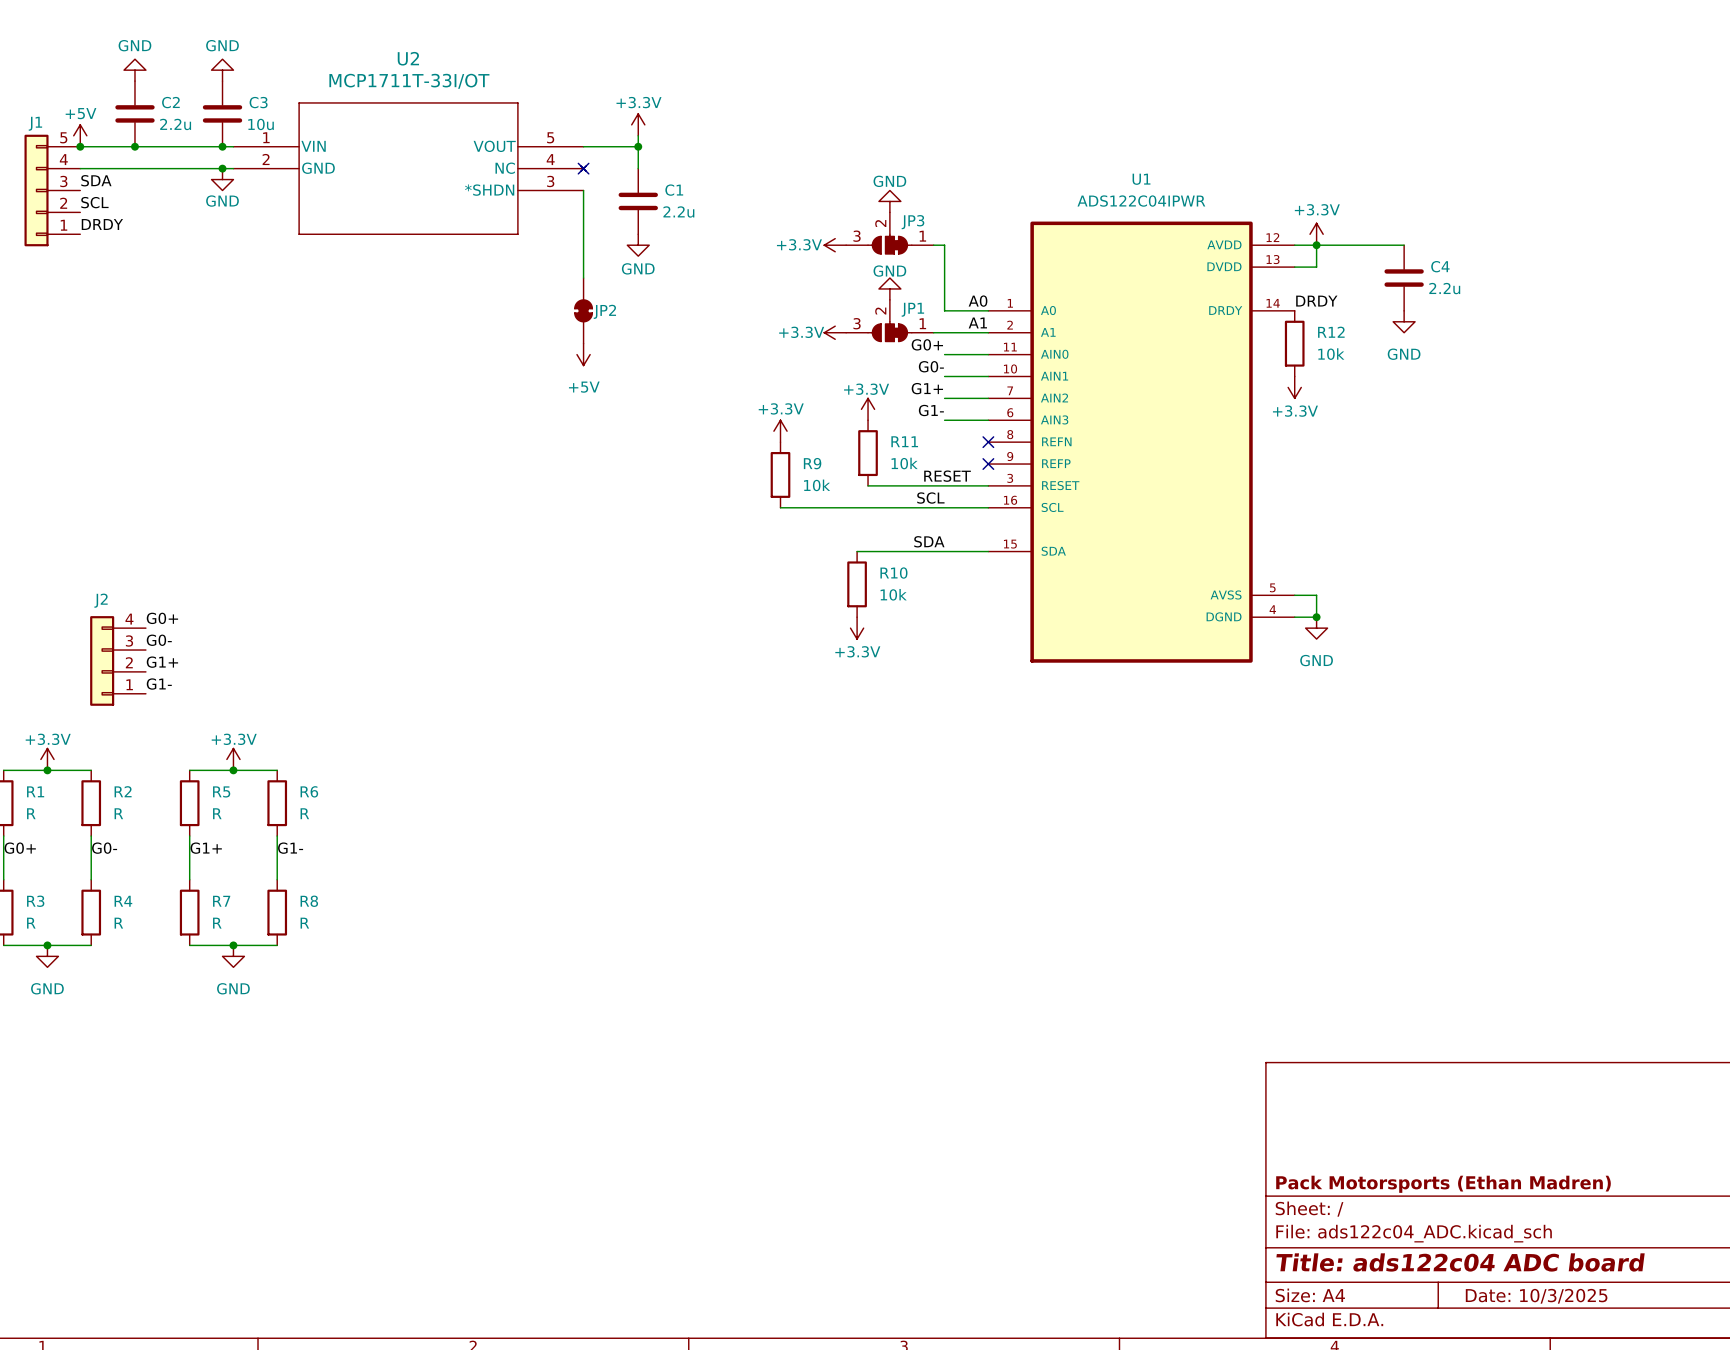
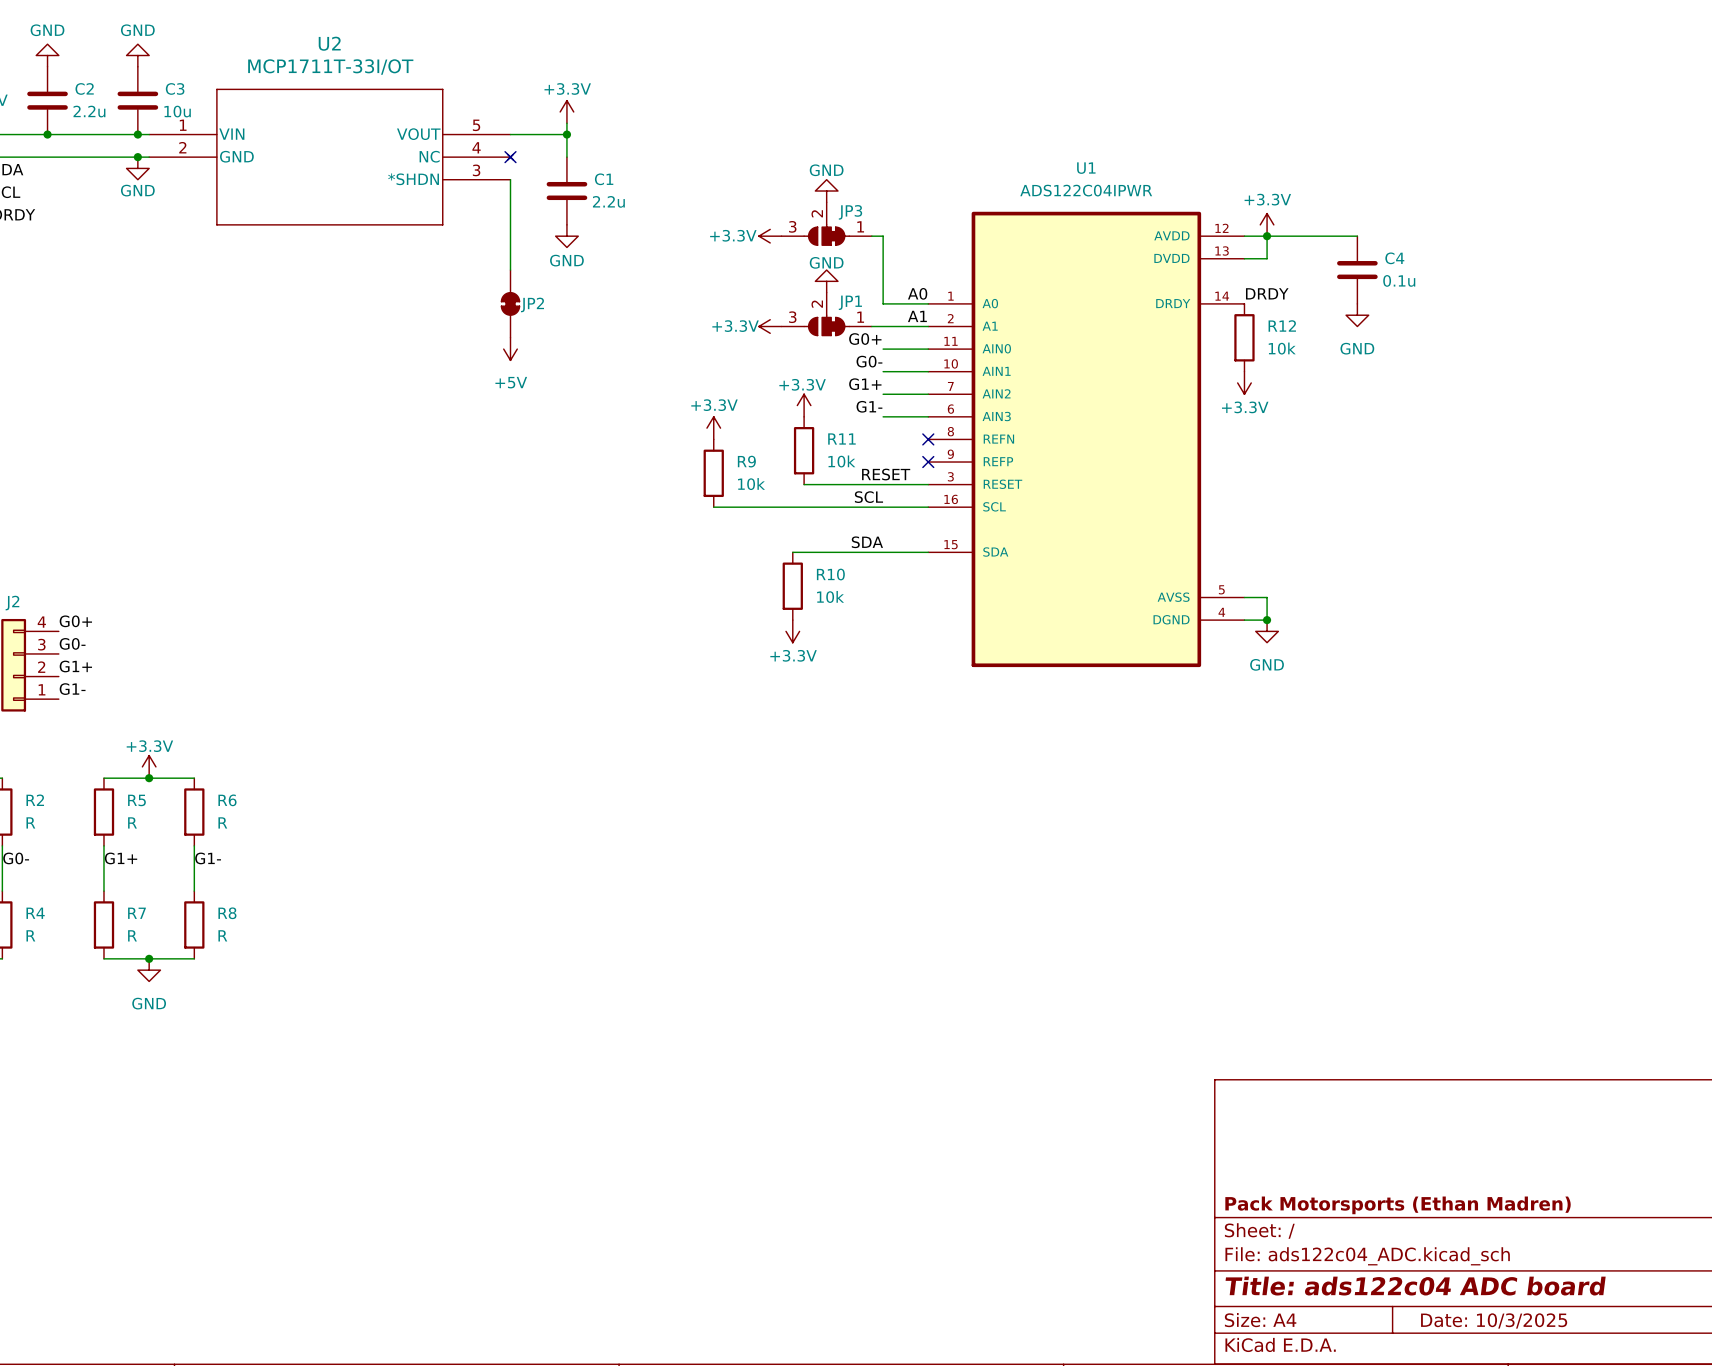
C4 value: 2.2u (1444, 288) -> 0.1u (1399, 280)

